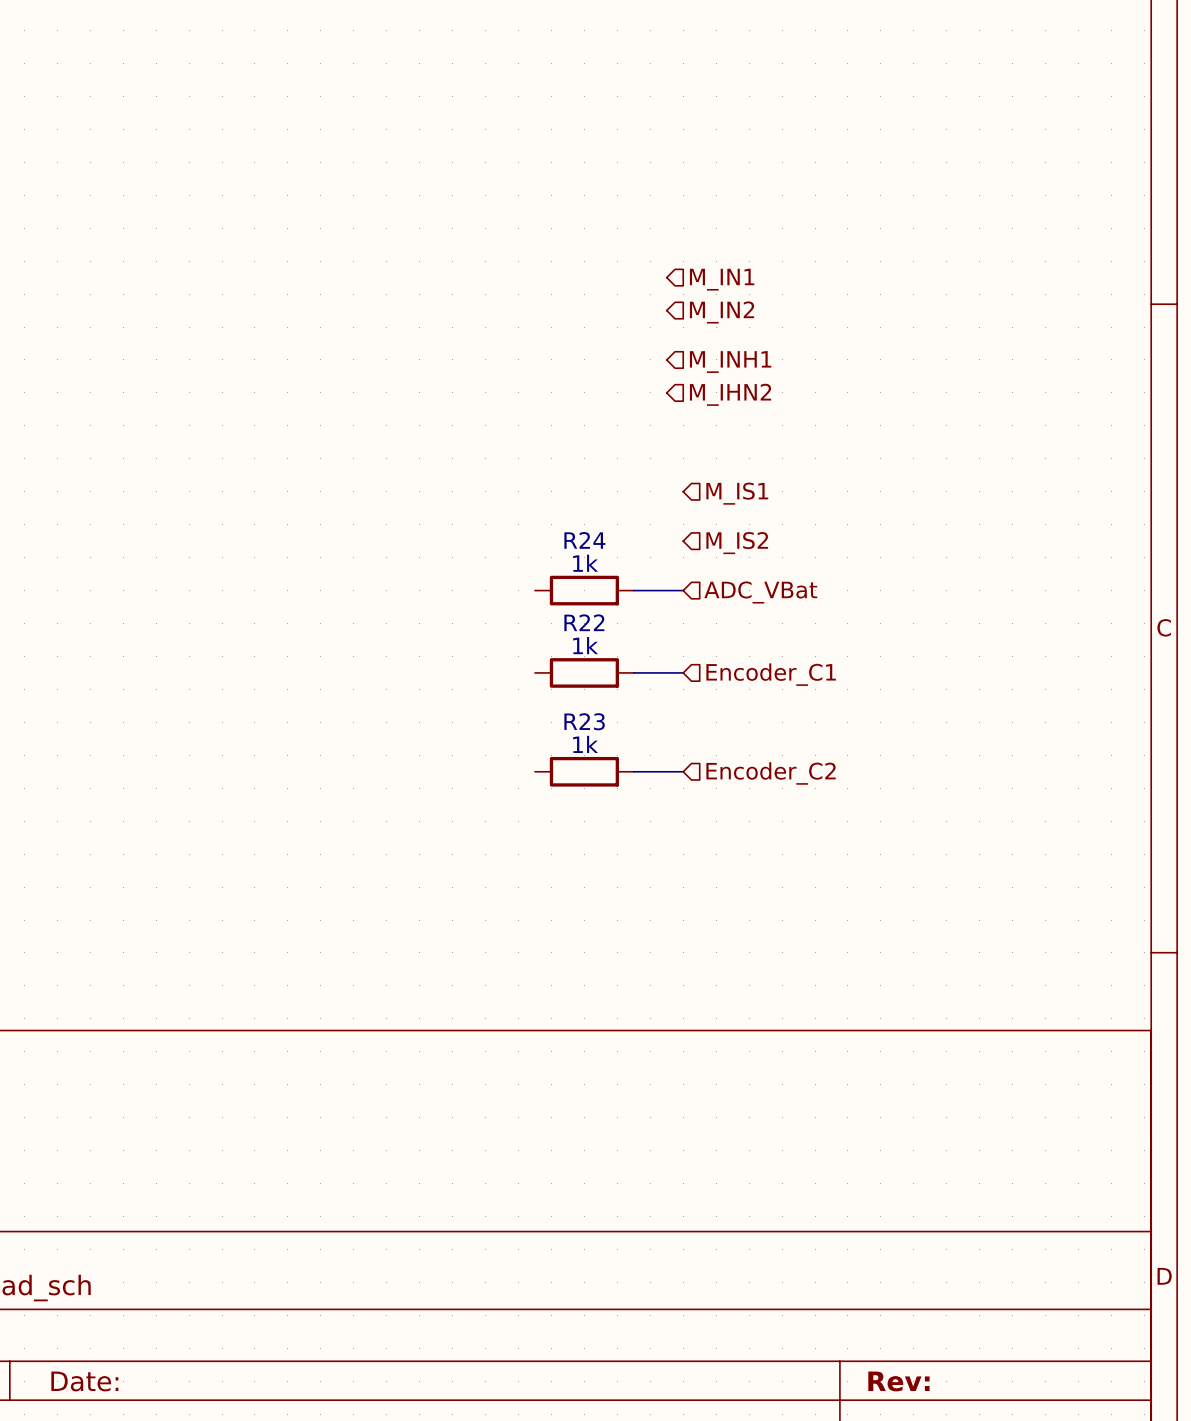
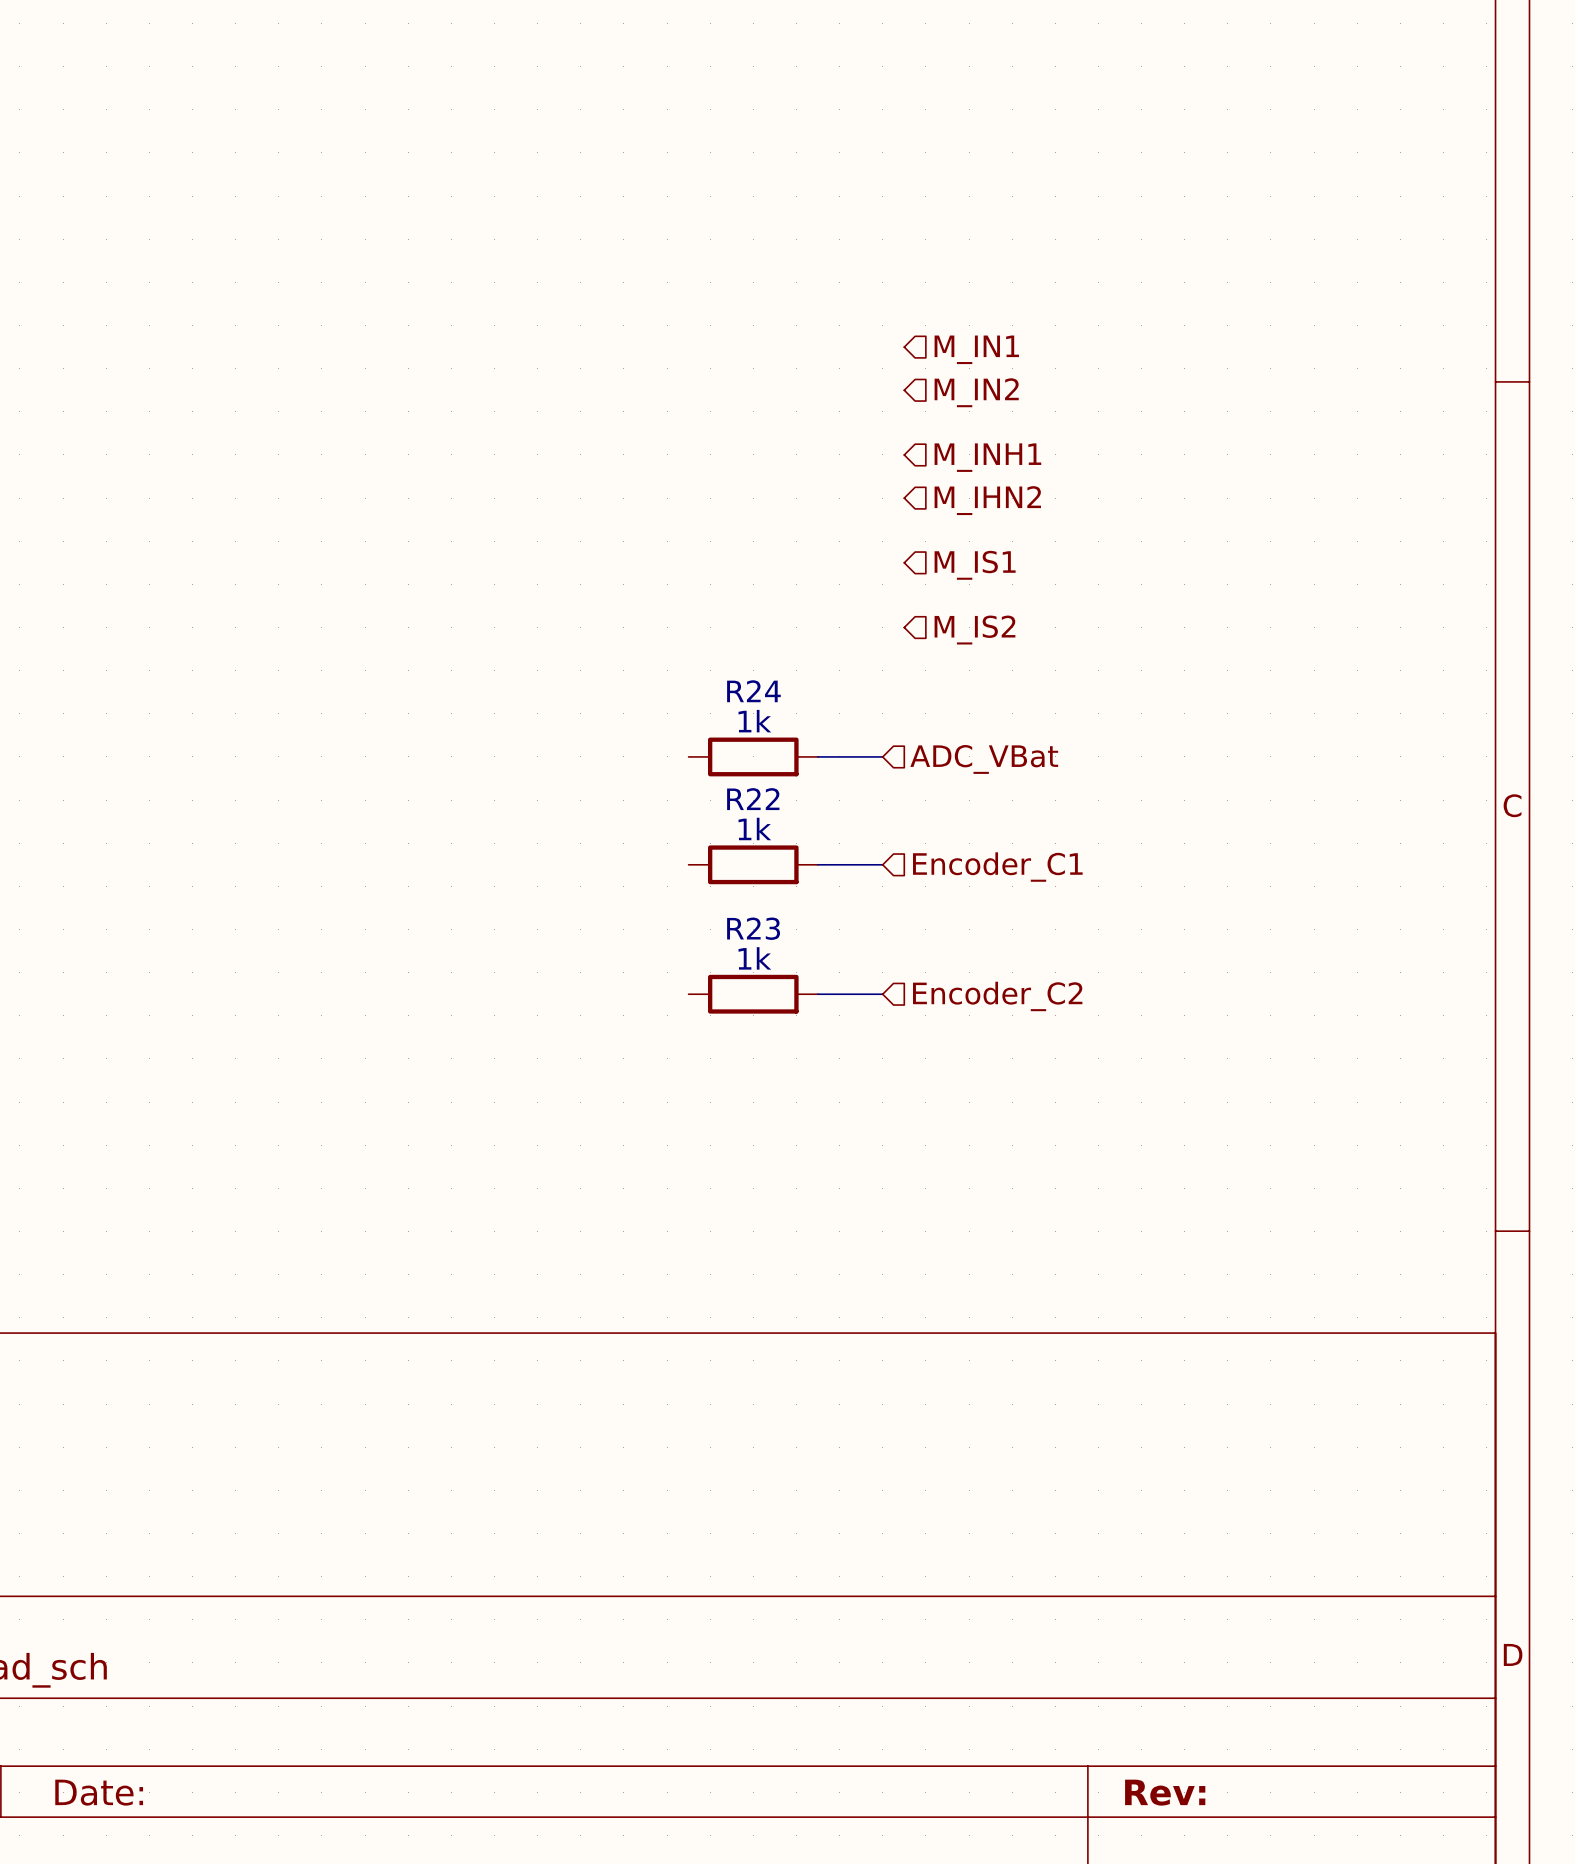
hierarchical label position: M_IN1 (722, 279) -> M_IN1 (976, 349)
hierarchical label position: M_IN2 (722, 312) -> M_IN2 (976, 392)
hierarchical label position: M_INH1 (730, 362) -> M_INH1 (987, 457)
hierarchical label position: M_IHN2 (730, 394) -> M_IHN2 (987, 500)
hierarchical label position: M_IS1 (737, 493) -> M_IS1 (975, 565)
hierarchical label position: M_IS2 (737, 543) -> M_IS2 (974, 630)

